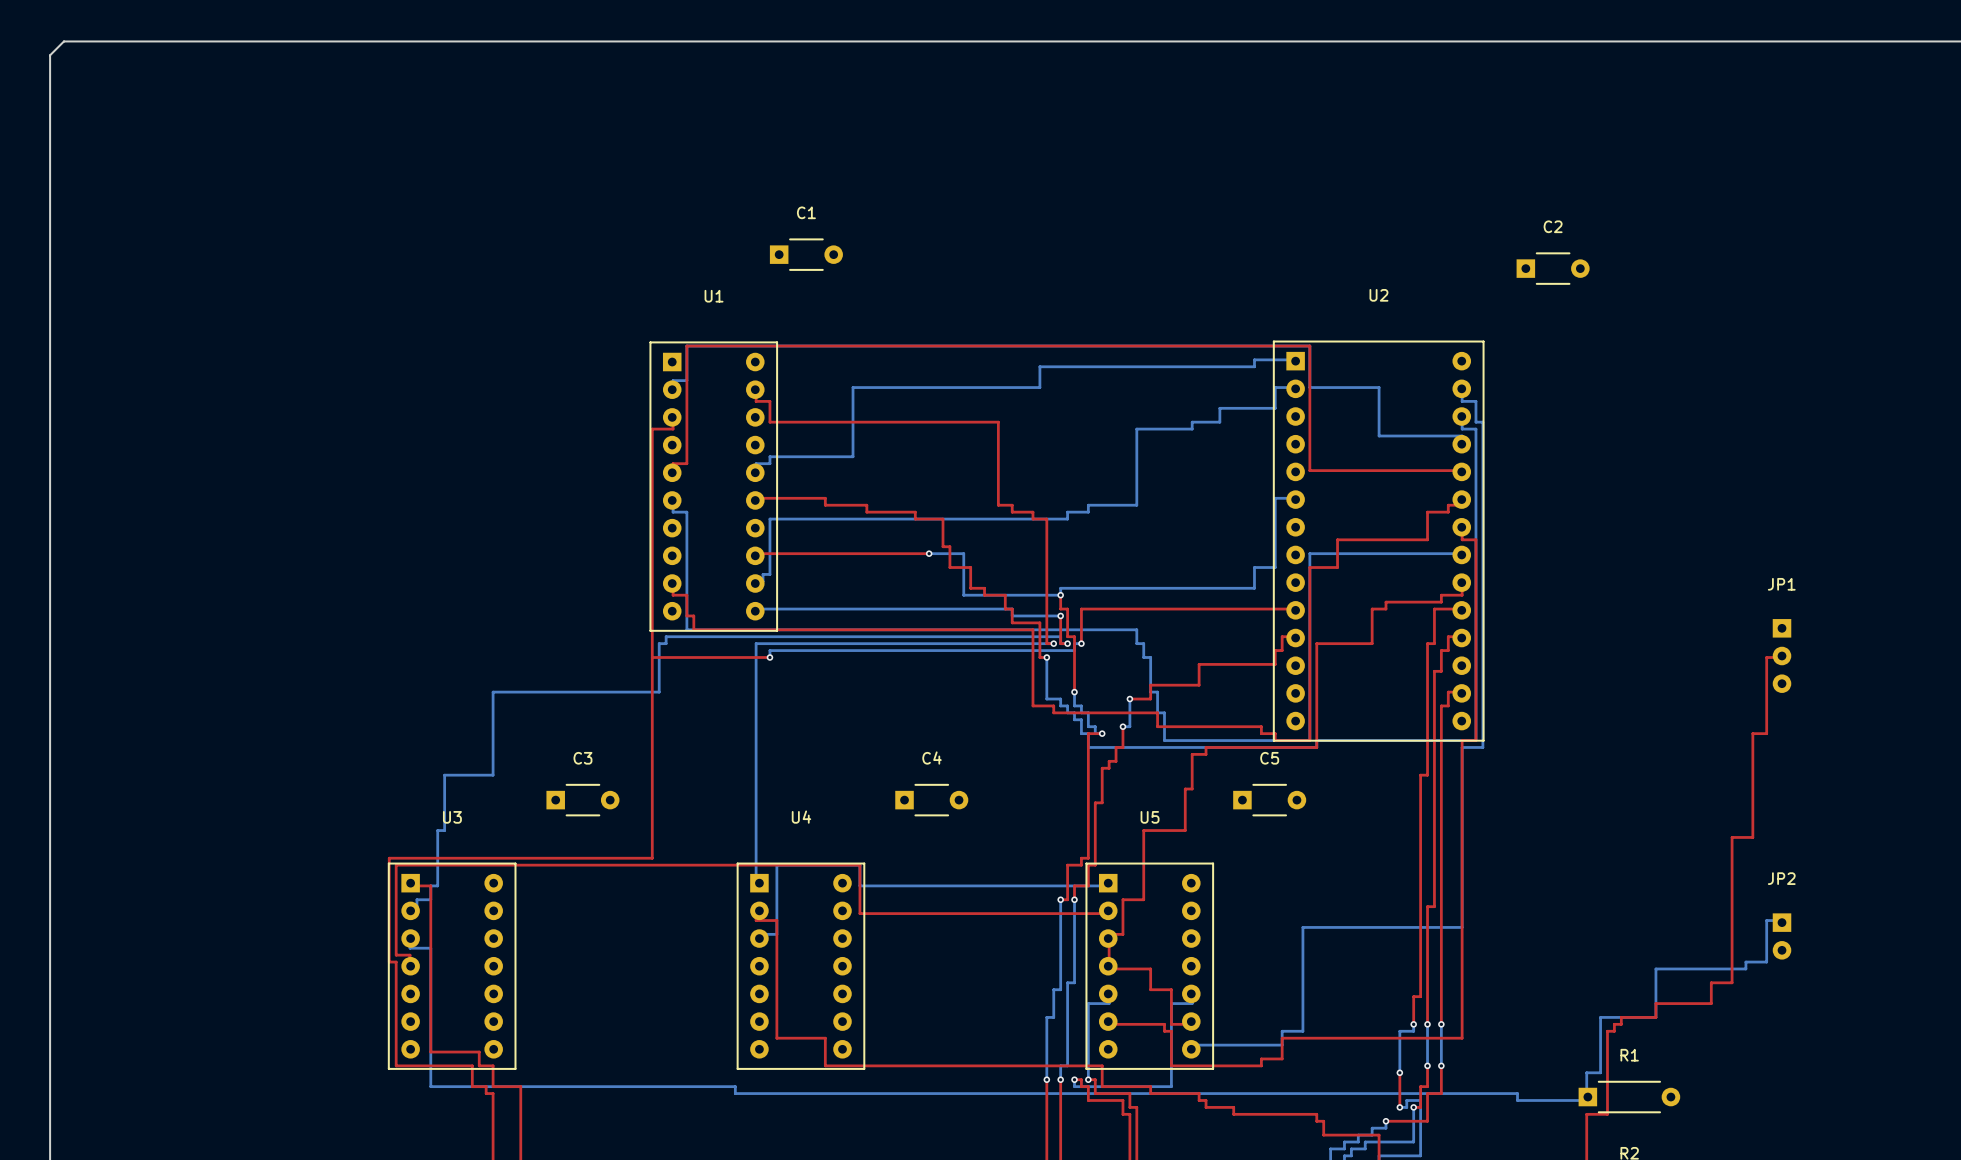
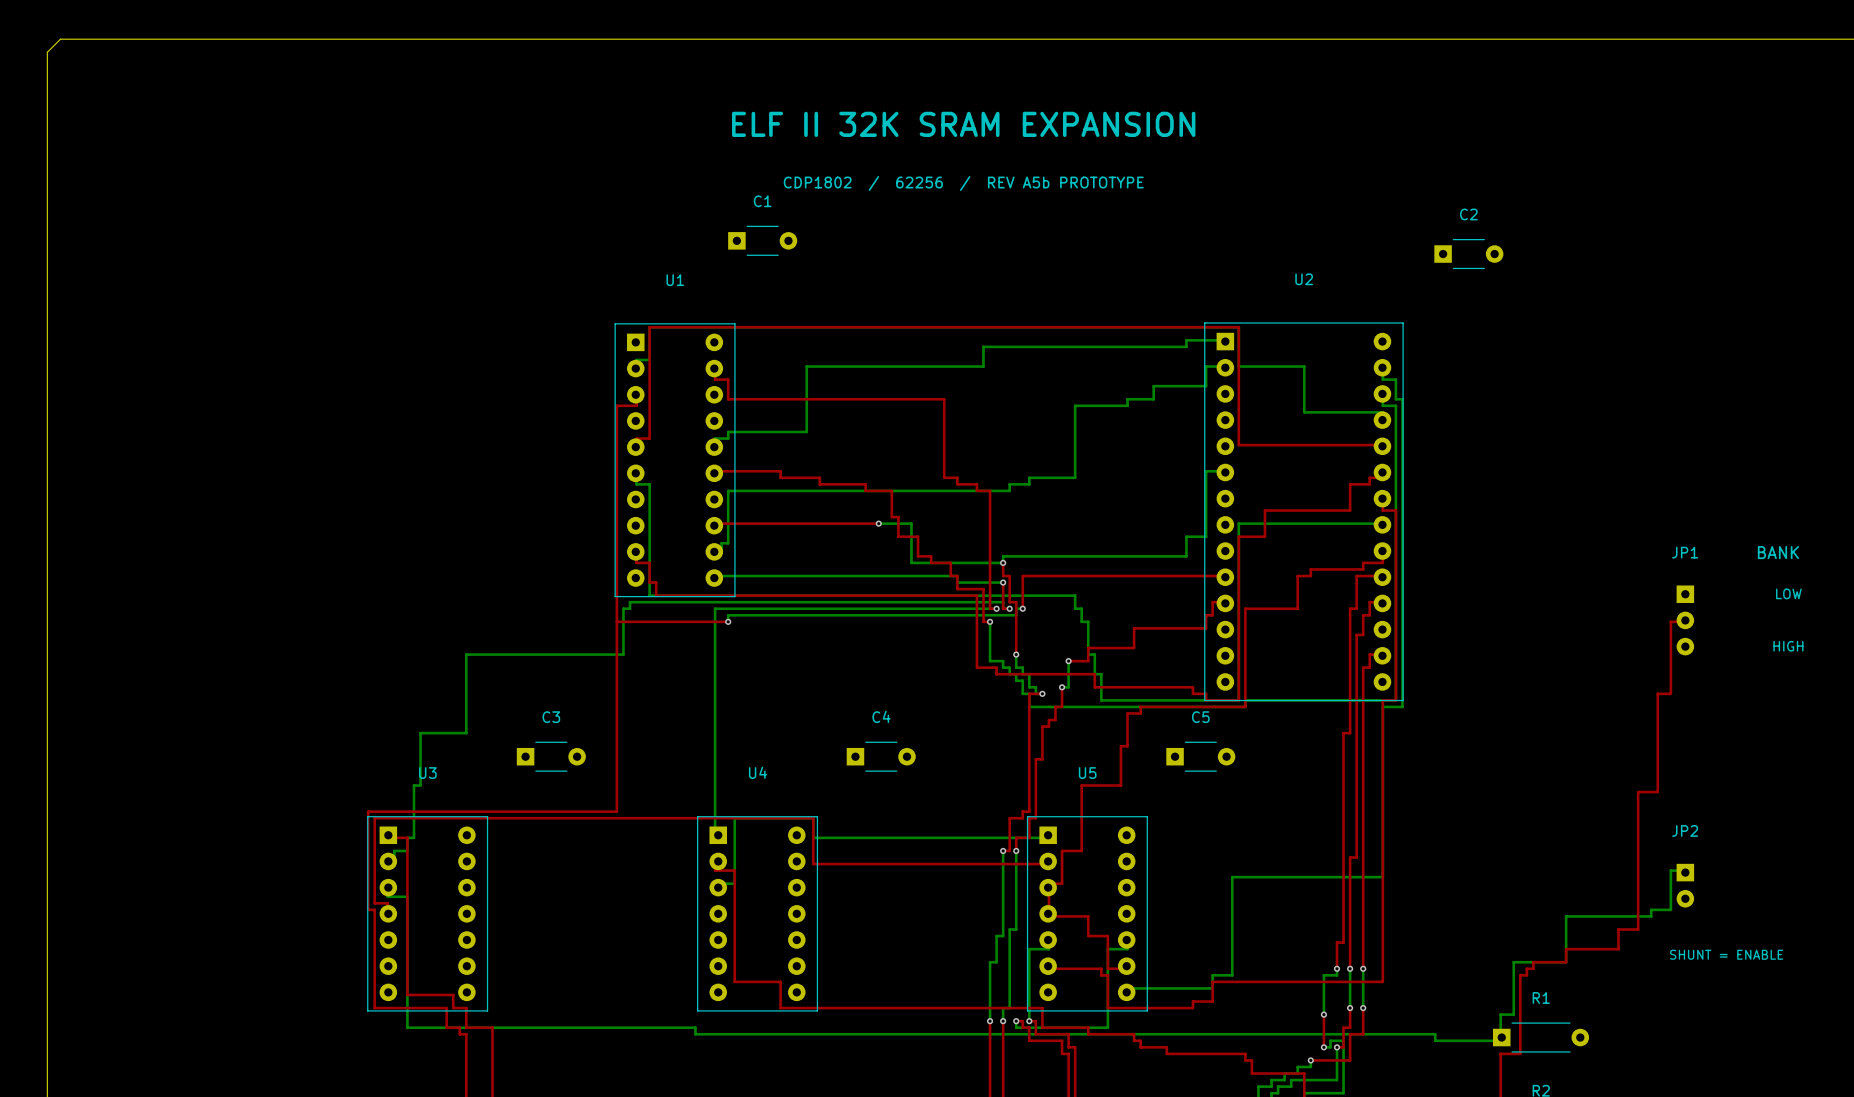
text: none -> ELF II 32K SRAM EXPANSION (963, 124)
text: none -> CDP1802 / 62256 / REV A5b PROTOTYPE (963, 183)
text: none -> BANK (1778, 552)
text: none -> LOW (1788, 593)
text: none -> HIGH (1788, 646)
text: none -> SHUNT = ENABLE (1726, 954)

